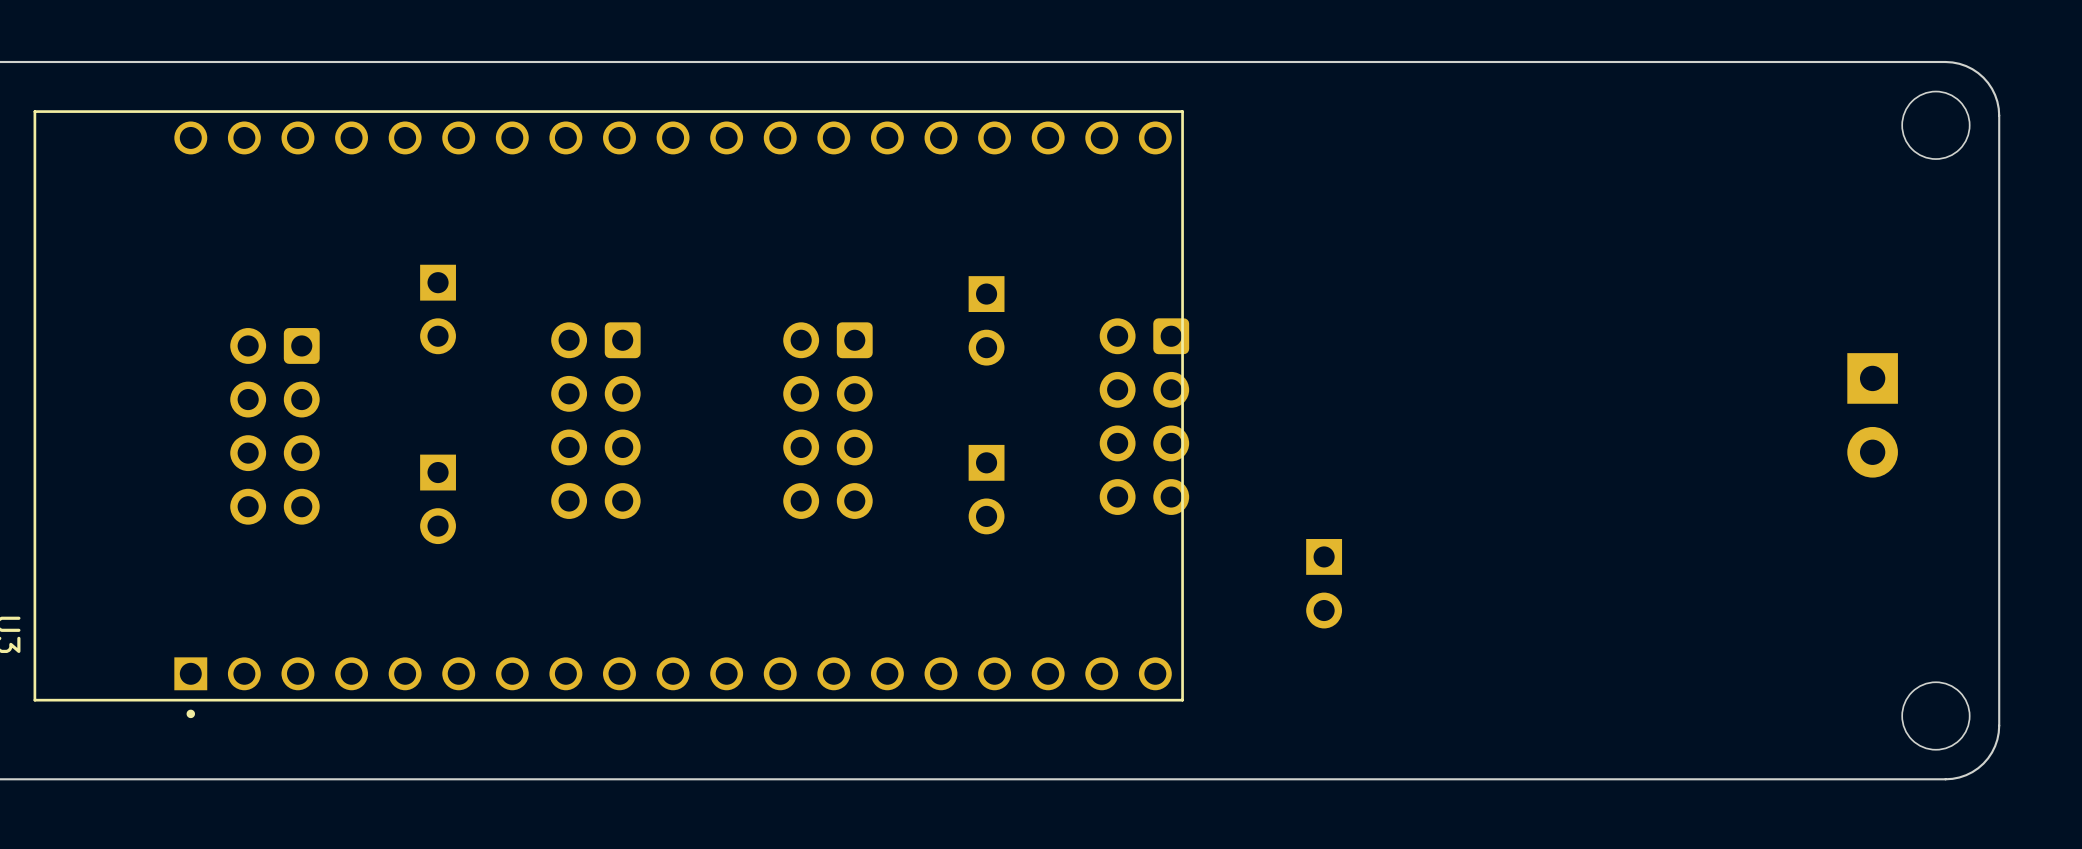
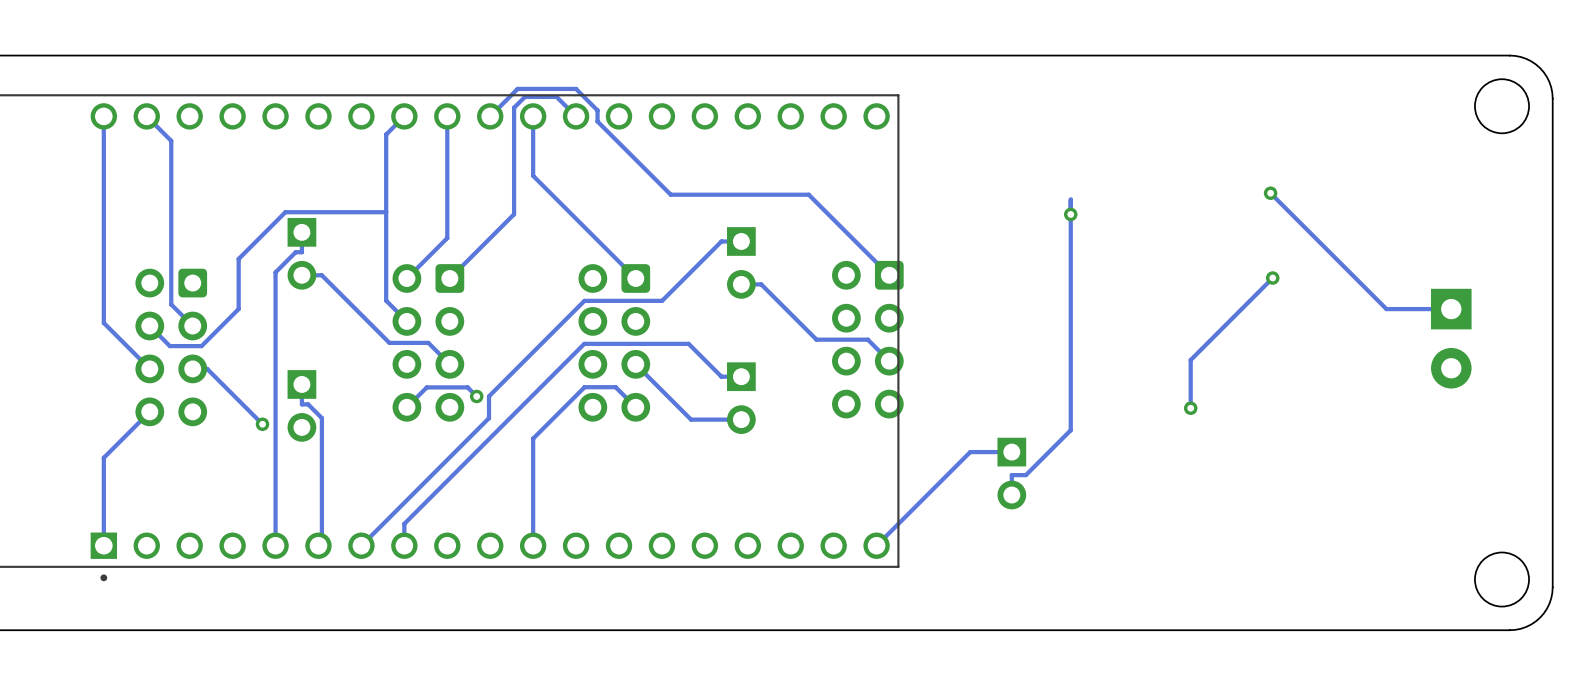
track: none -> (103, 116) (103, 322) (149, 368)
track: none -> (146, 116) (171, 140) (171, 304) (192, 325)
track: none -> (404, 116) (386, 134) (386, 300) (406, 321)
track: none -> (447, 116) (447, 238) (406, 278)
track: none -> (490, 116) (517, 88) (576, 88) (597, 110) (597, 121) (670, 194) (808, 194) (889, 275)
track: none -> (533, 116) (533, 175) (635, 278)
track: none -> (576, 116) (556, 96) (524, 96) (514, 107) (514, 214) (449, 278)
track: none -> (1270, 193) (1386, 309) (1451, 309)
via: none -> (1270, 193)
track: none -> (1070, 199) (1070, 430) (1025, 475) (1011, 475) (1011, 495)
track: none -> (386, 212) (285, 212) (238, 258) (238, 309) (201, 346) (169, 346) (149, 325)
via: none -> (1070, 214)
track: none -> (301, 232) (301, 252) (295, 252) (275, 272) (275, 545)
track: none -> (741, 241) (721, 241) (662, 300) (584, 300) (489, 396) (489, 418) (361, 545)
track: none -> (301, 275) (321, 275) (389, 342) (428, 342) (449, 364)
track: none -> (1272, 275) (1272, 278) (1190, 360) (1190, 408)
via: none -> (1272, 278)
track: none -> (741, 284) (761, 284) (816, 339) (867, 339) (889, 361)
track: none -> (635, 364) (691, 419) (741, 419)
track: none -> (192, 368) (207, 368) (262, 424)
track: none -> (741, 376) (721, 376) (688, 343) (584, 343) (404, 523) (404, 545)
track: none -> (301, 384) (301, 404) (308, 404) (321, 418) (321, 542) (318, 545)
track: none -> (476, 396) (467, 387) (426, 387) (406, 407)
via: none -> (476, 396)
track: none -> (635, 407) (615, 387) (584, 387) (533, 438) (533, 545)
via: none -> (1190, 408)
track: none -> (149, 411) (103, 457) (103, 545)
via: none -> (262, 424)
track: none -> (1011, 452) (970, 452) (876, 545)

